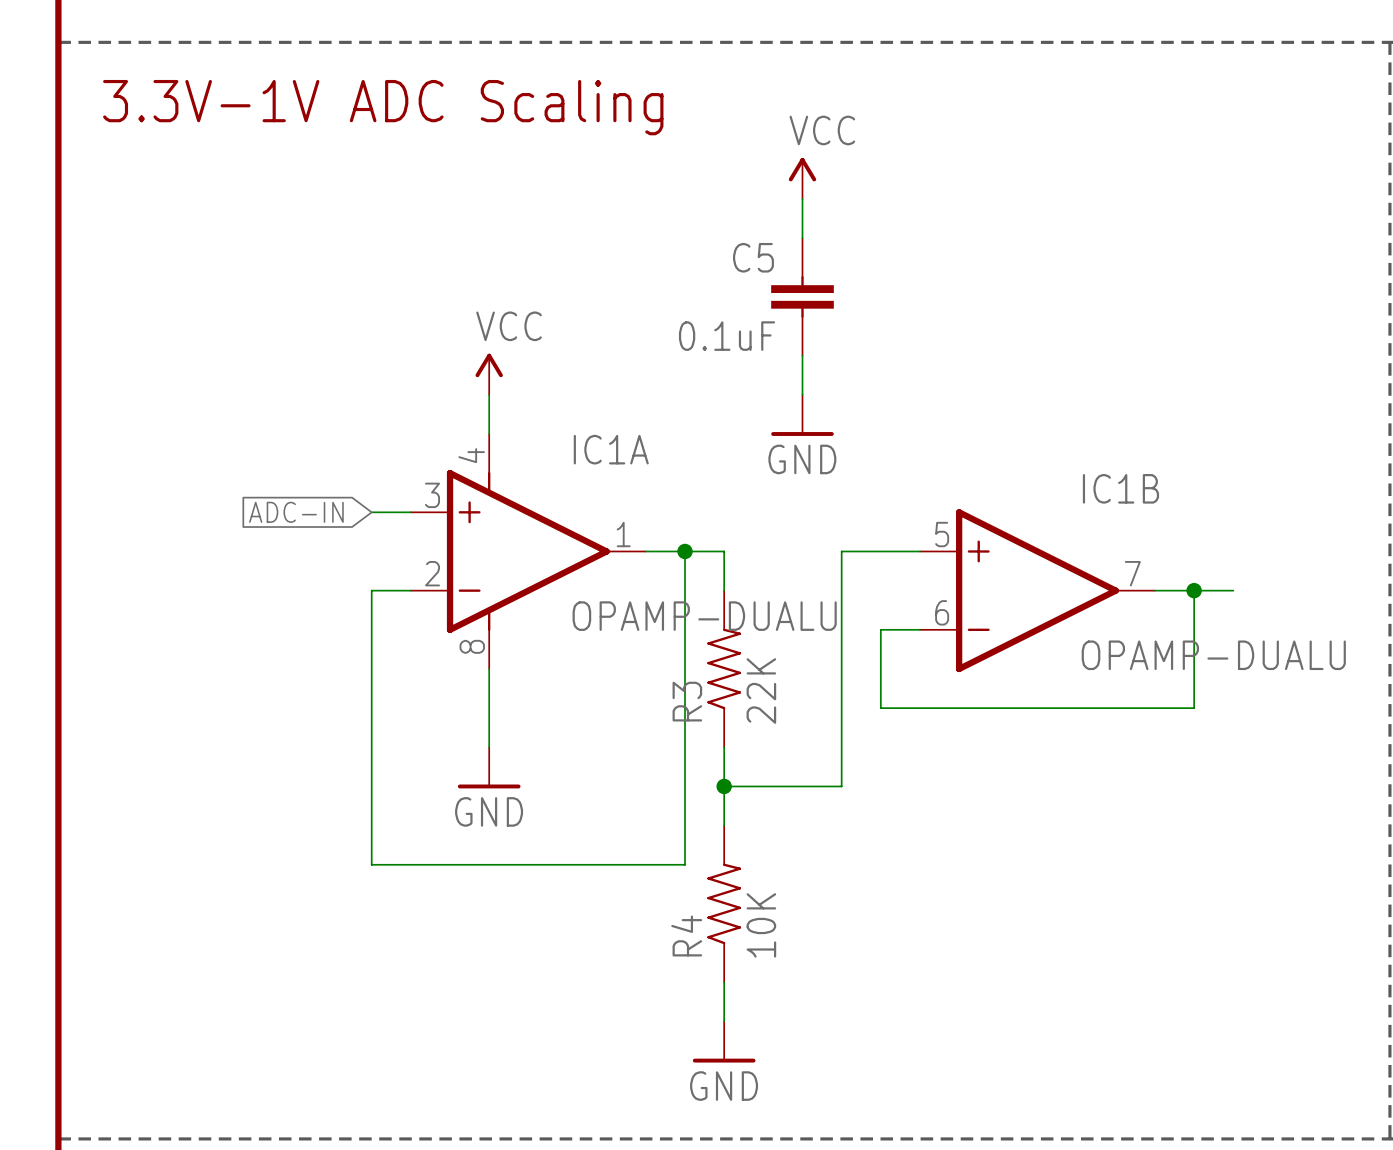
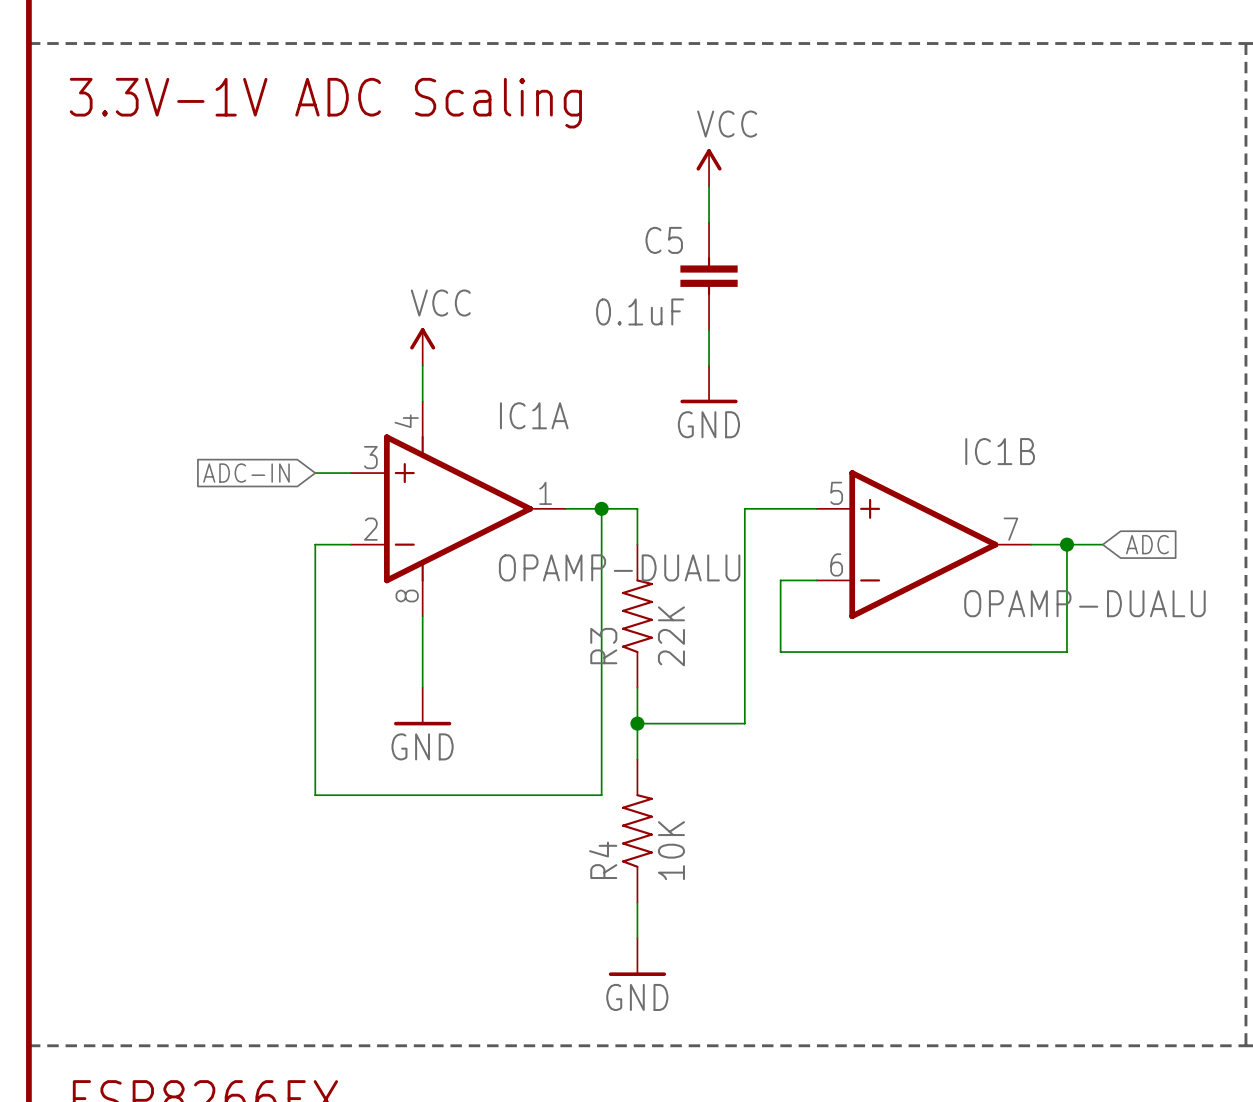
global label: none -> ADC (1147, 544)

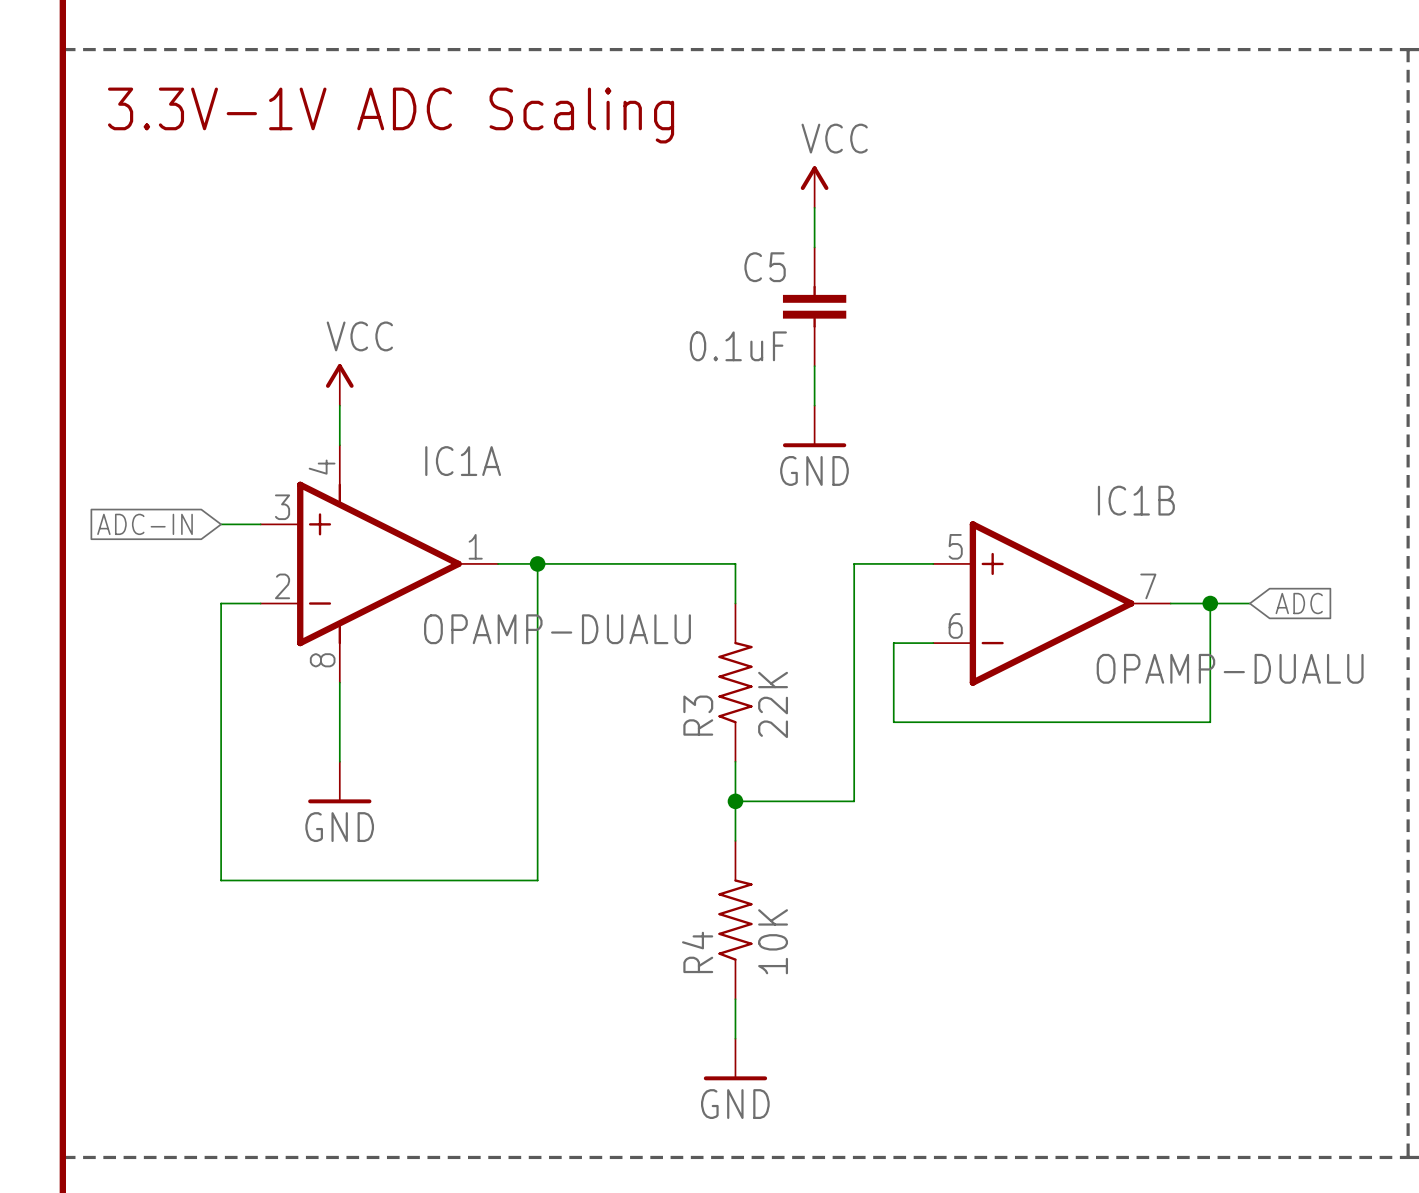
power symbol position: VCC (422, 346) -> VCC (339, 384)
wire: (422, 365) (422, 401) -> (339, 405) (339, 445)
global label position: ADC-IN (246, 473) -> ADC-IN (145, 524)
wire: (315, 473) (351, 473) -> (221, 524) (260, 524)
wire: none -> (498, 563) (656, 563)
IC1A position: (458, 508) -> (379, 563)
junction: none -> (537, 563)
wire: (601, 508) (601, 795) (458, 795) -> (537, 563) (537, 880)
junction: (601, 508) -> none
wire: (351, 544) (315, 544) (315, 795) -> (260, 603) (221, 603) (221, 880) (379, 880)
wire: (422, 616) (422, 687) -> (339, 682) (339, 761)
power symbol position: GND (422, 706) -> GND (339, 782)

